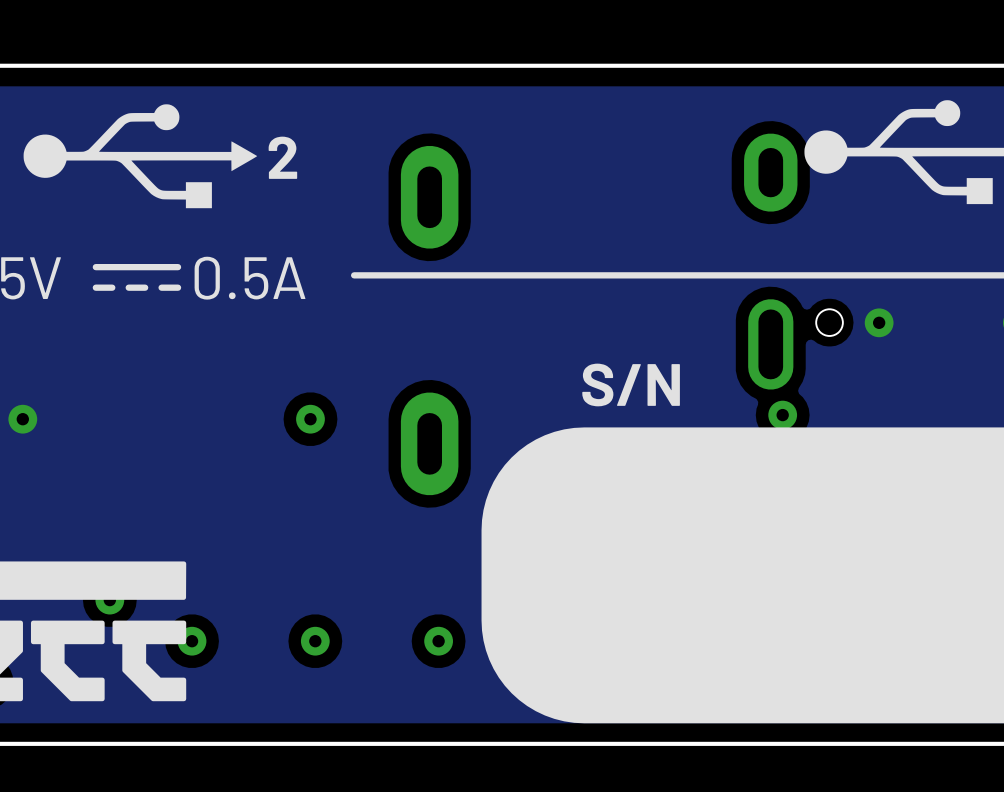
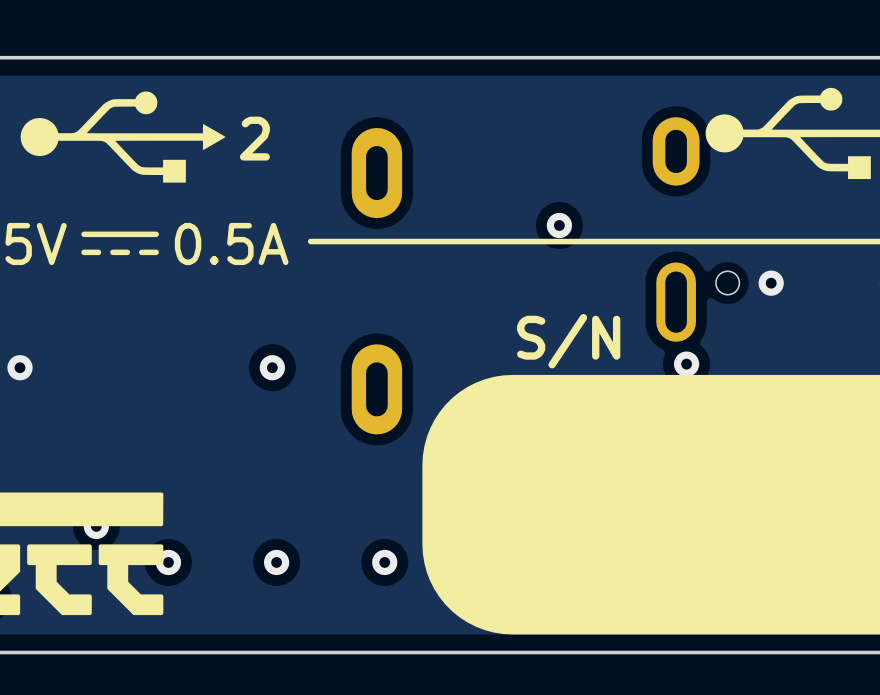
via: none -> (559, 225)

